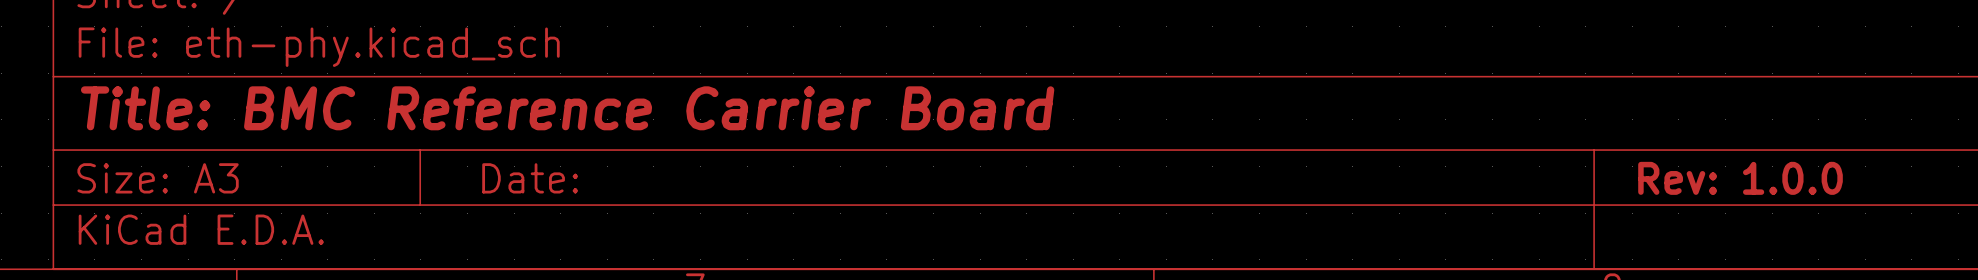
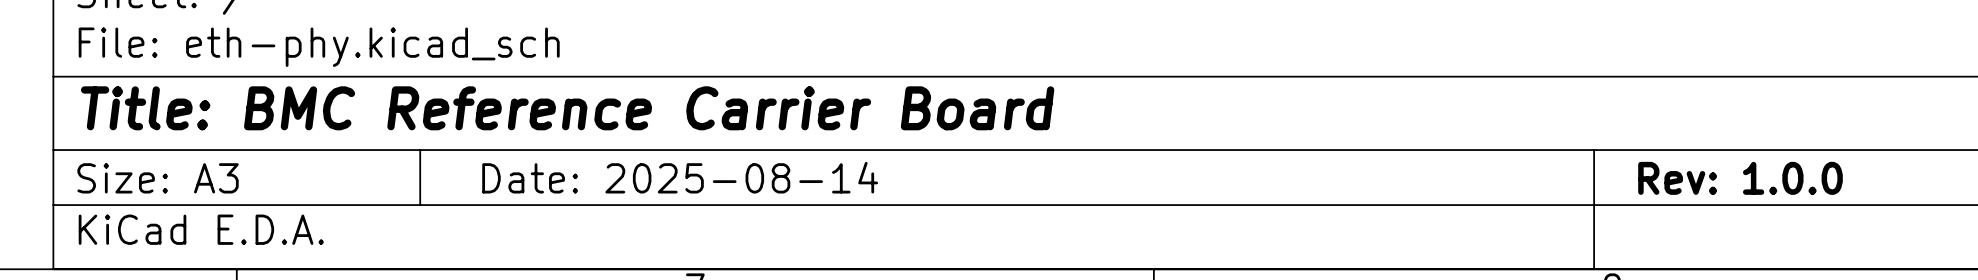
title block: Date: (530, 178) -> Date: 2025-08-14 (680, 177)

